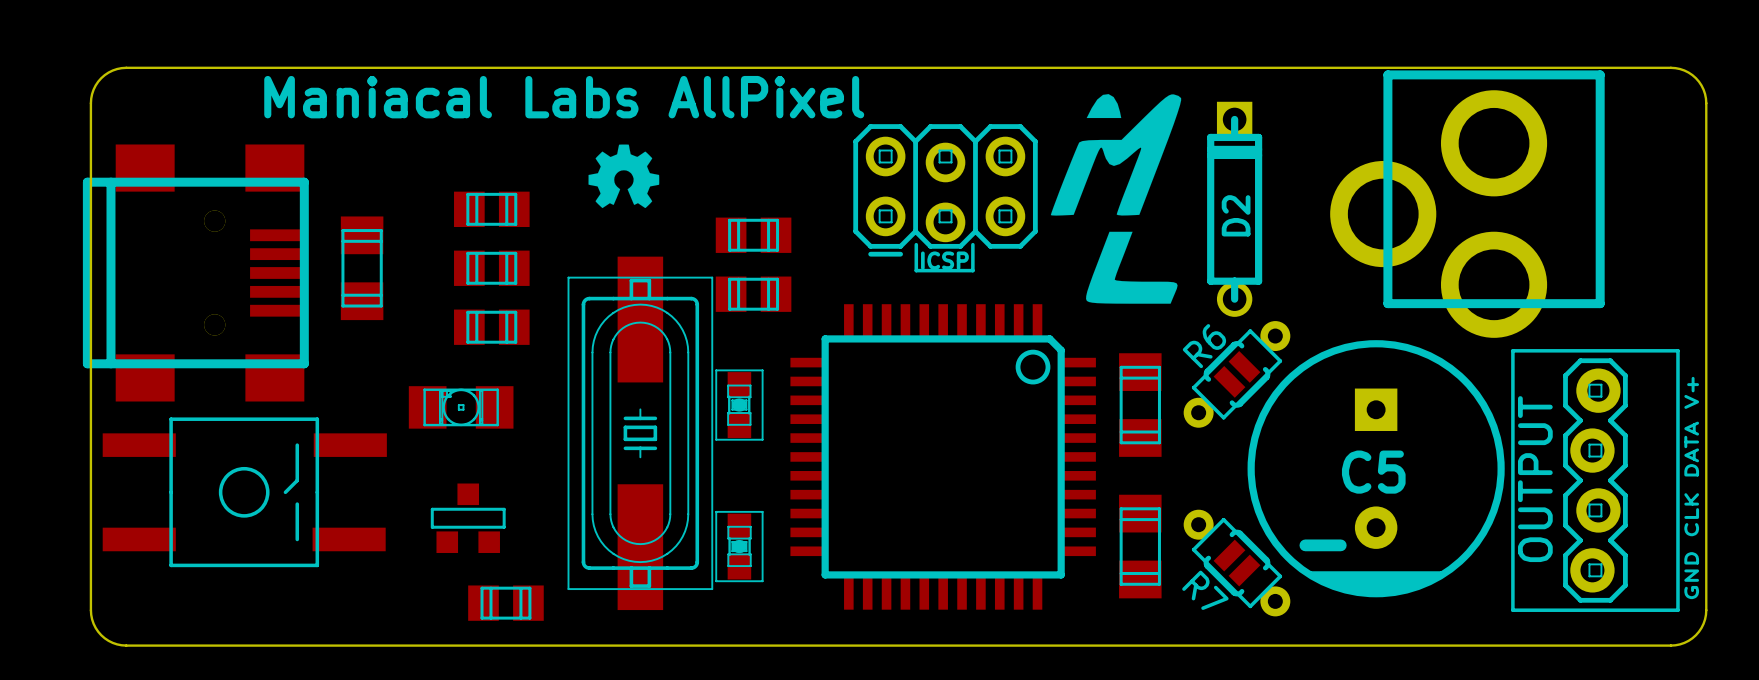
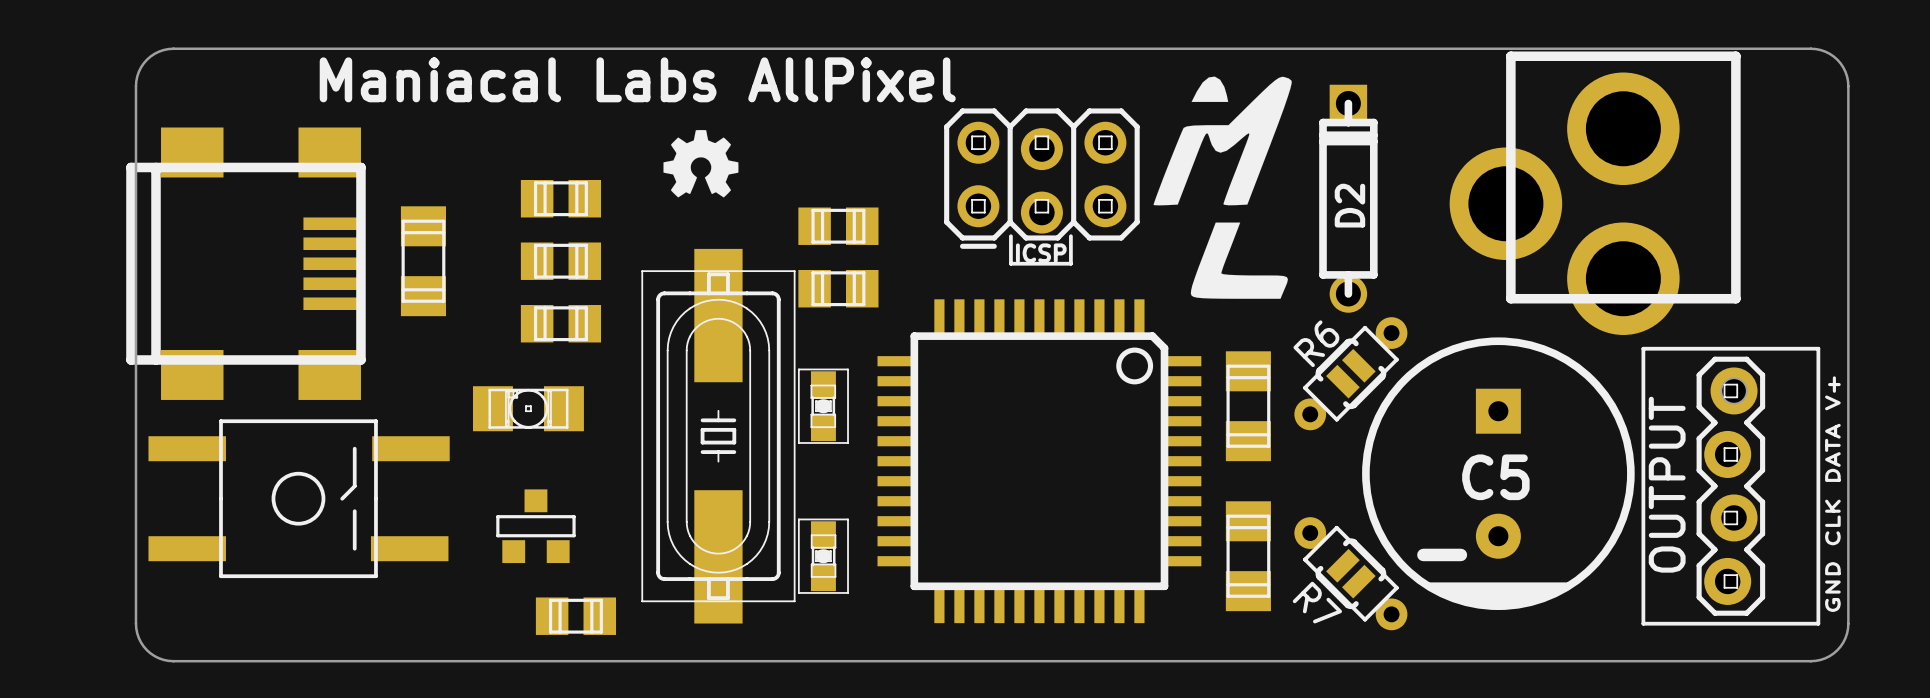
part footprint: [82, 144, 309, 402] -> [126, 127, 366, 400]

